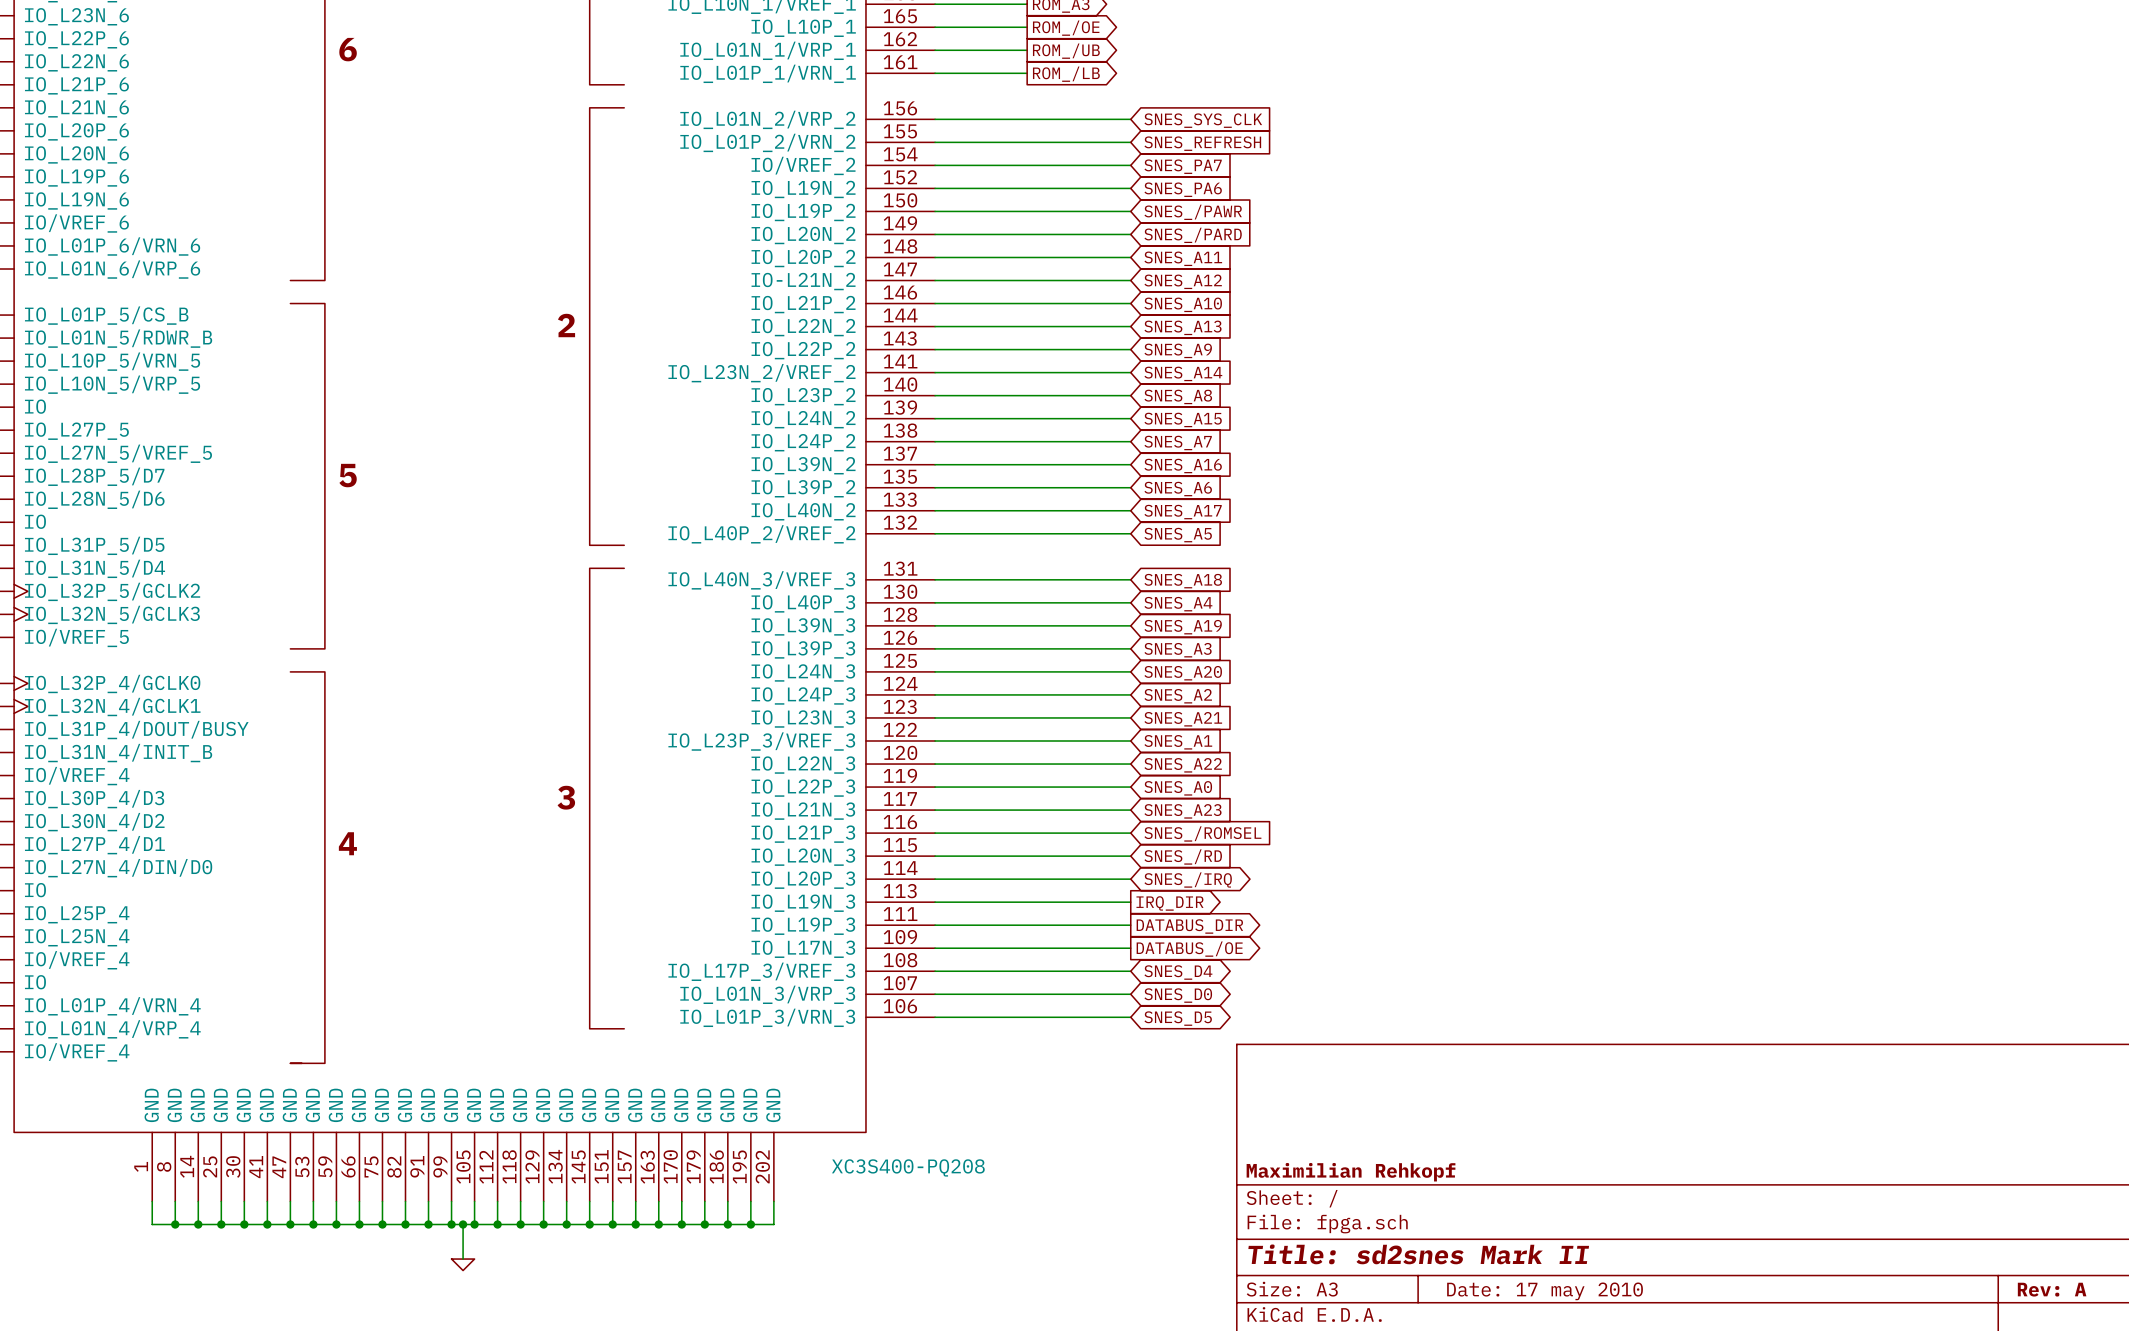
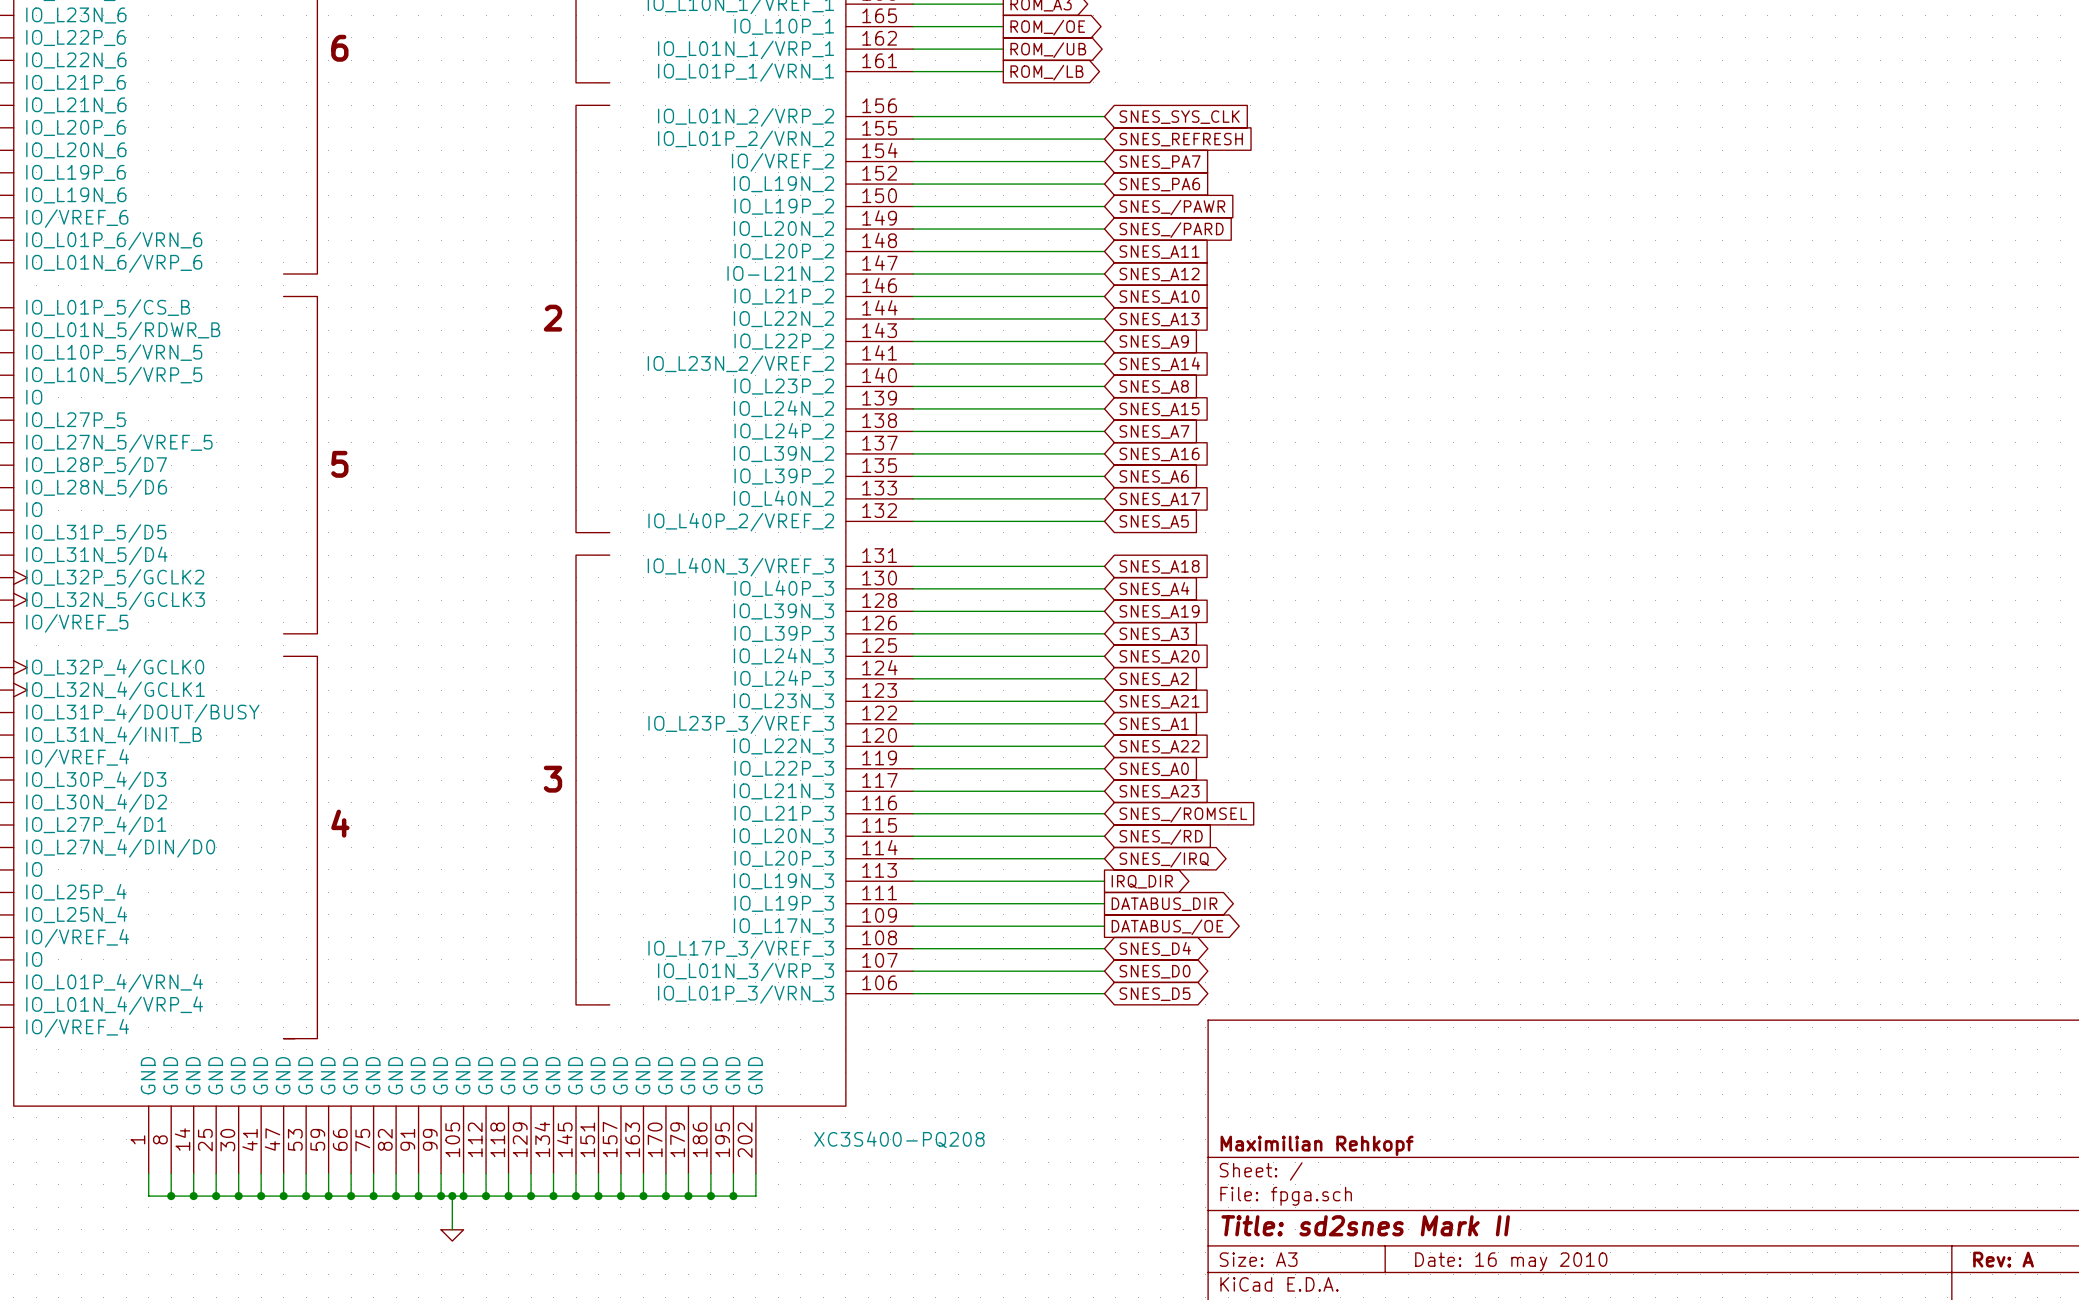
title block: Date: 17 may 2010 (1545, 1291) -> Date: 16 may 2010 (1511, 1261)

